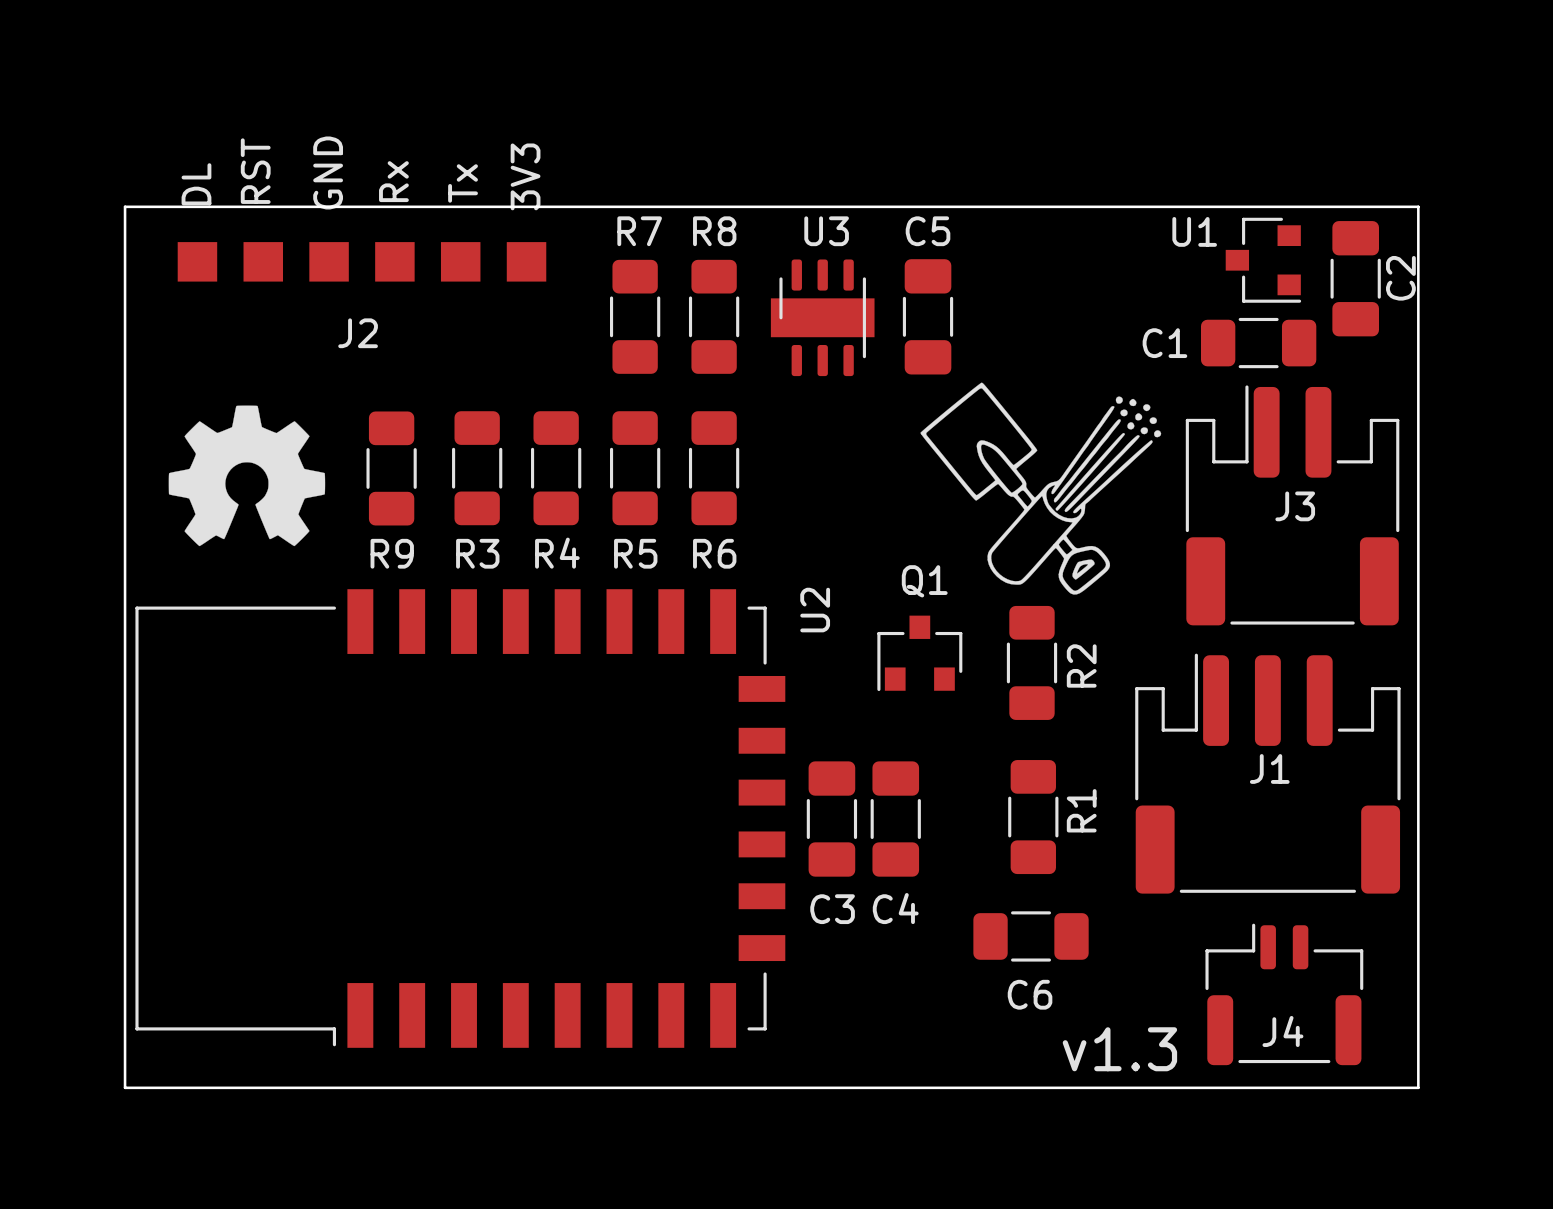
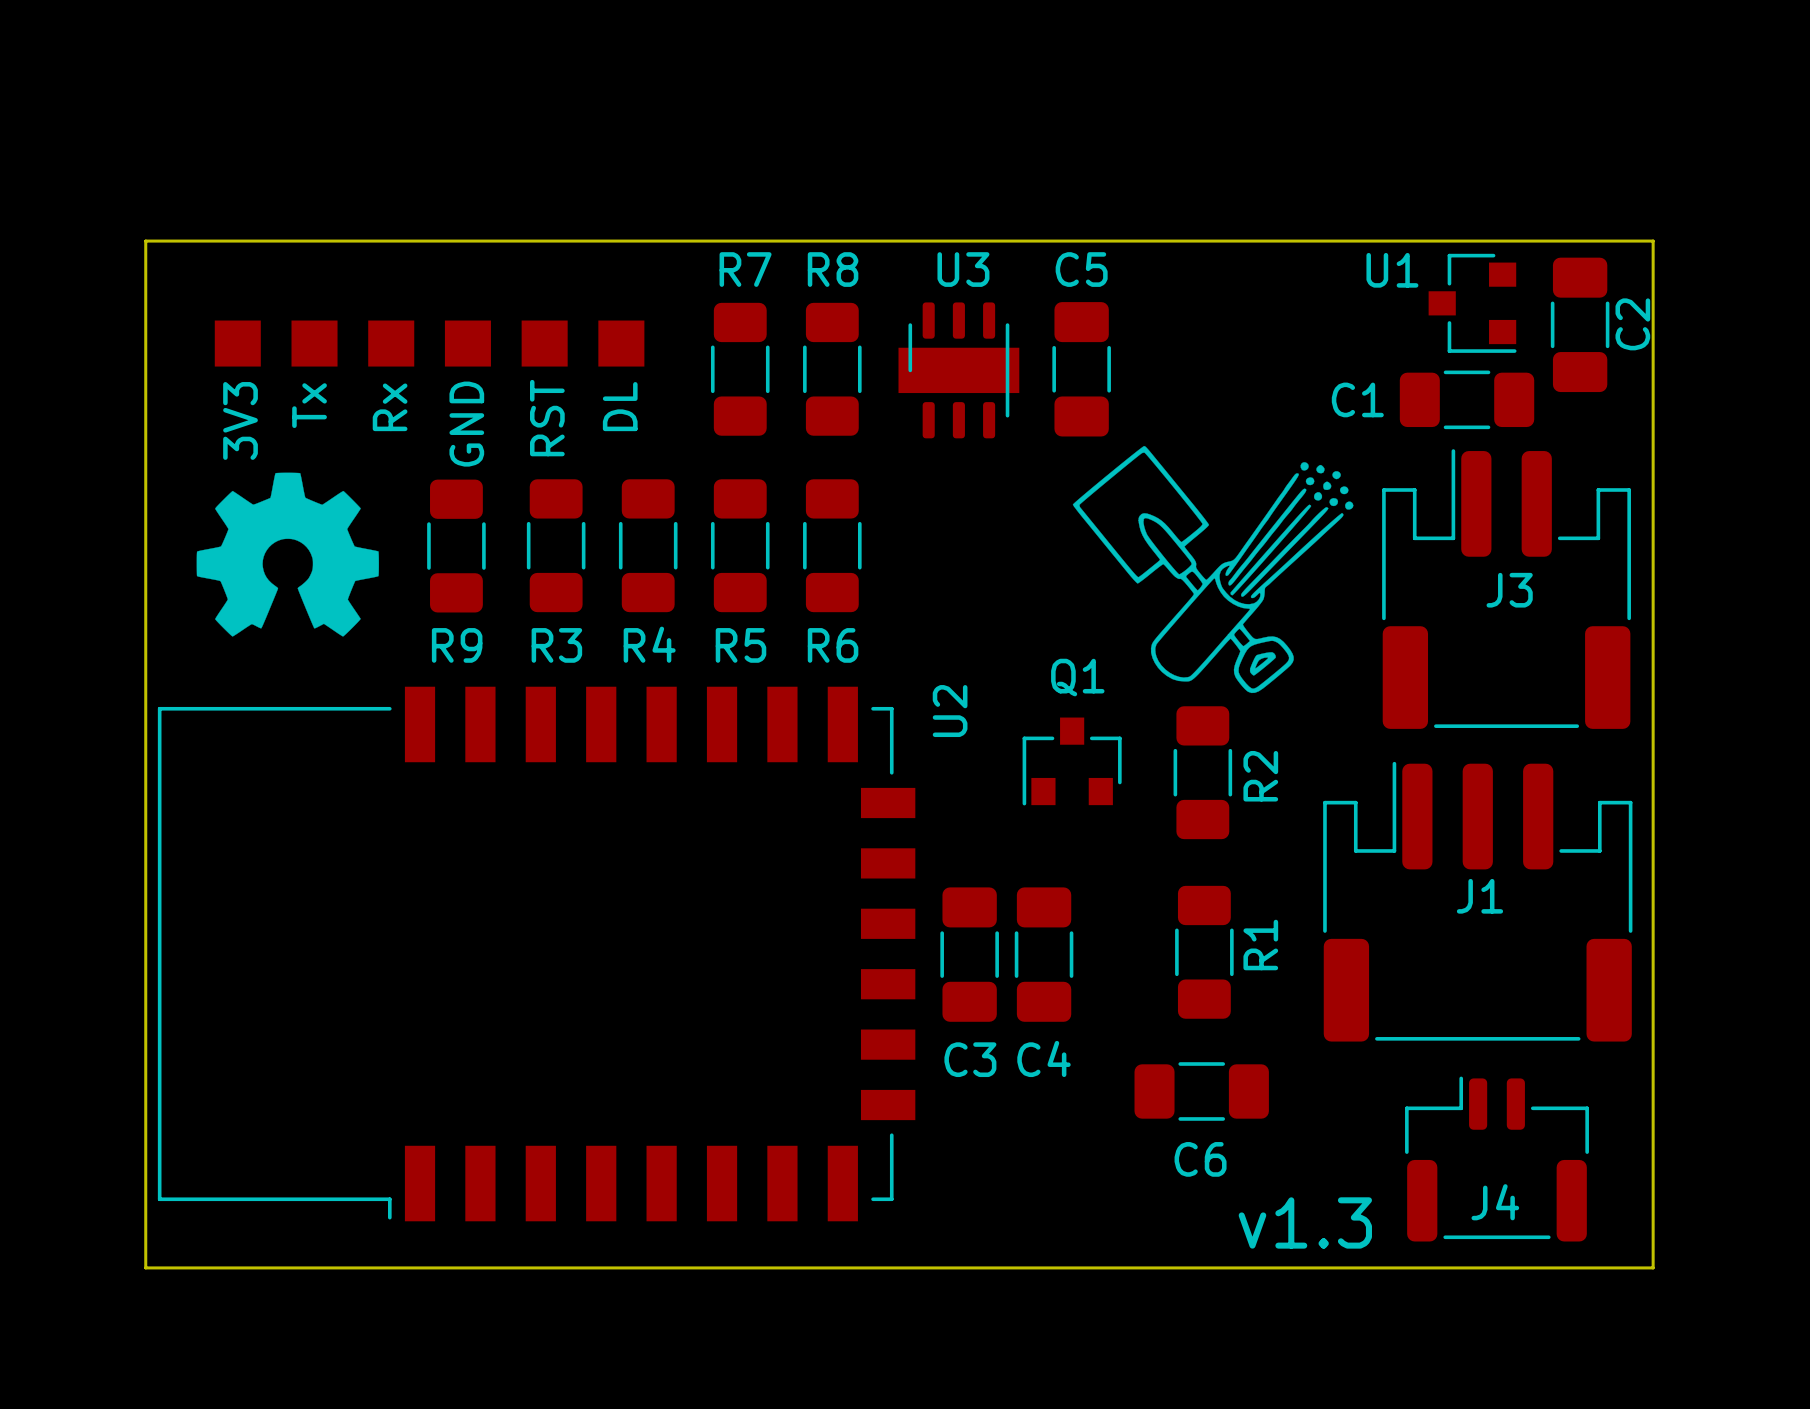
J2: (361, 261) -> none
part: none -> (429, 343)

